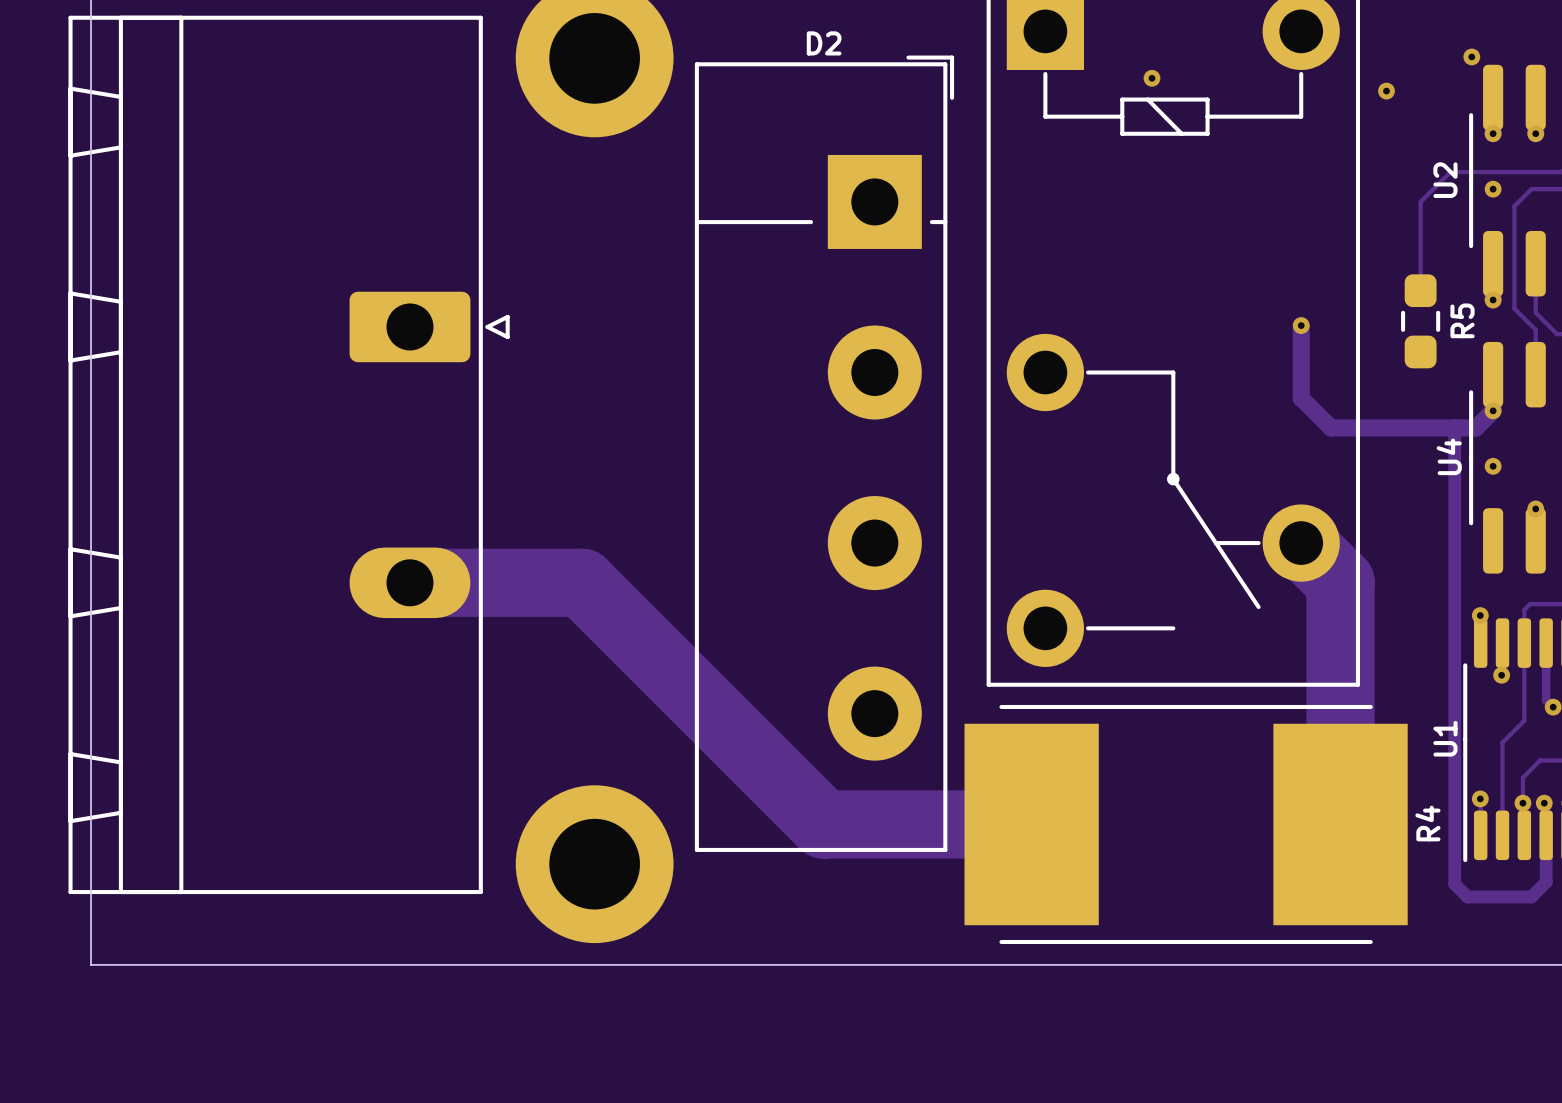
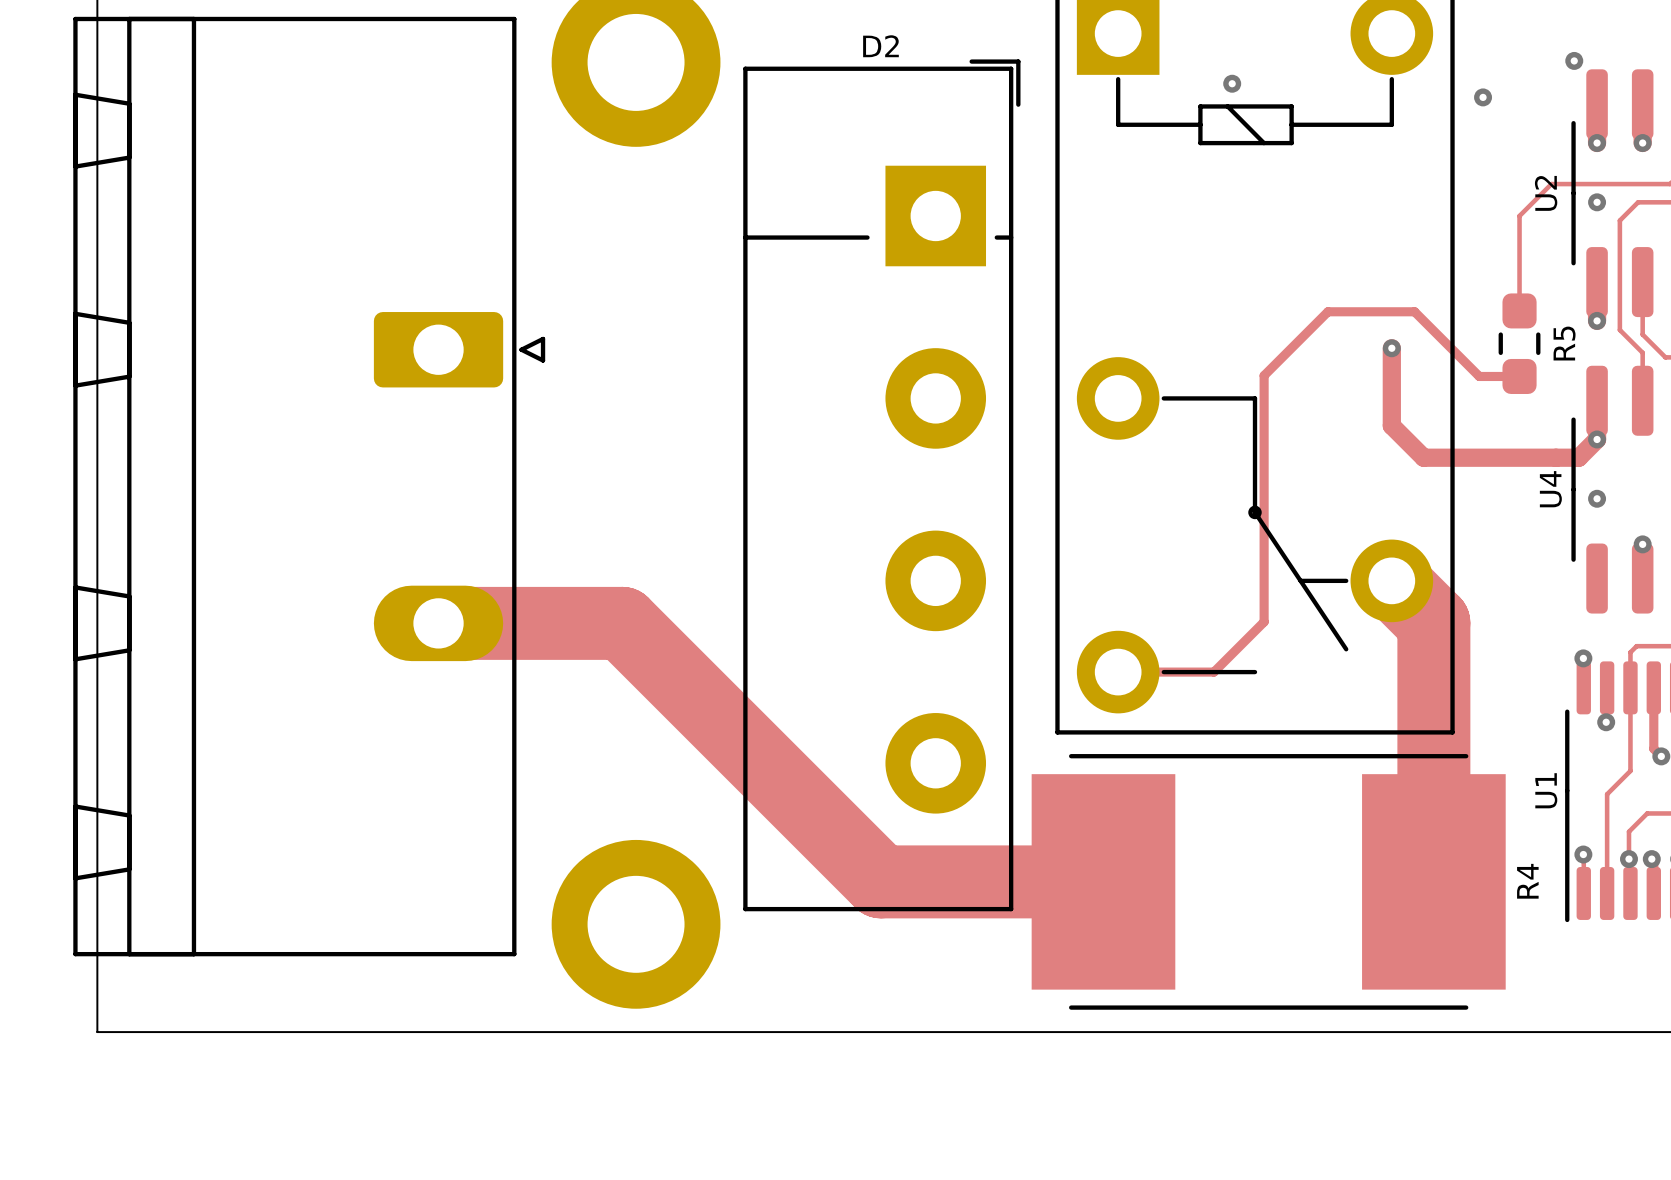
track: none -> (1519, 376) (1479, 376) (1414, 311) (1327, 311) (1264, 375) (1264, 621) (1213, 672) (1118, 672)
track: (1454, 427) (1454, 884) (1467, 896) (1531, 896) (1546, 882) (1546, 835) -> none

